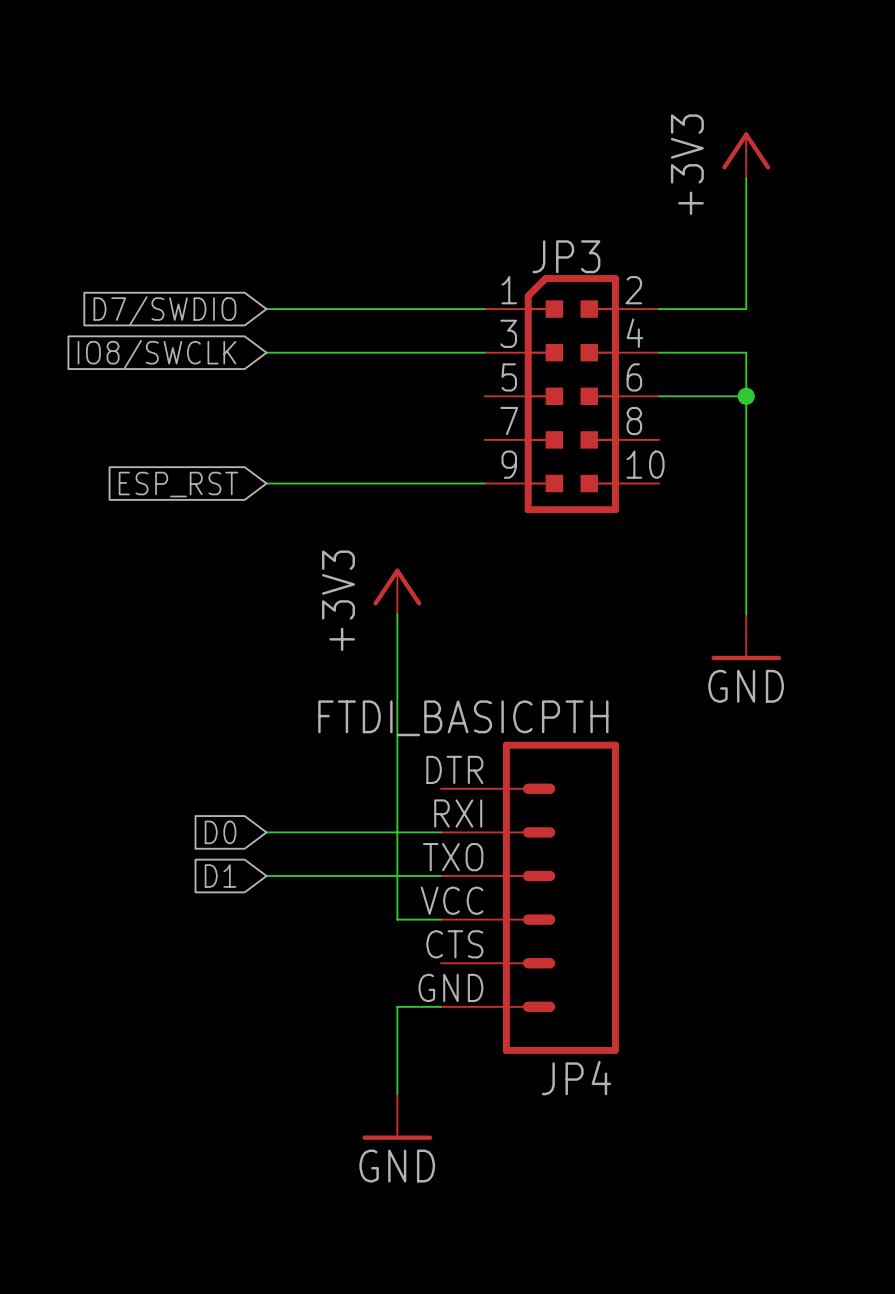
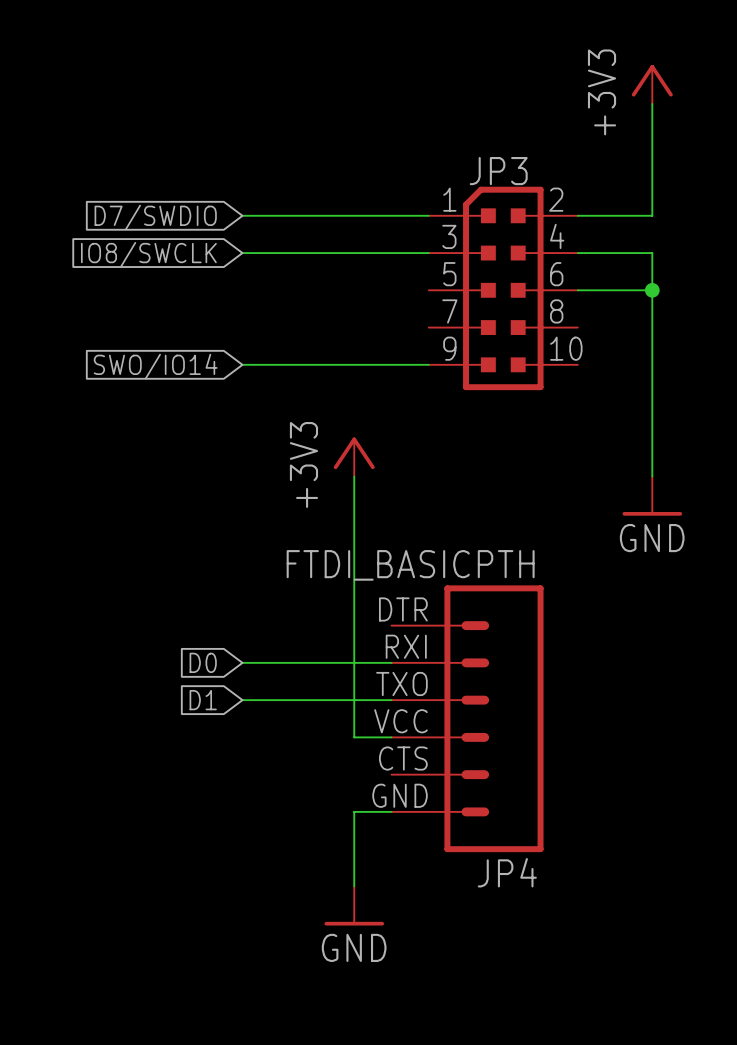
global label: ESP_RST (178, 484) -> SWO/IO14 (155, 366)

